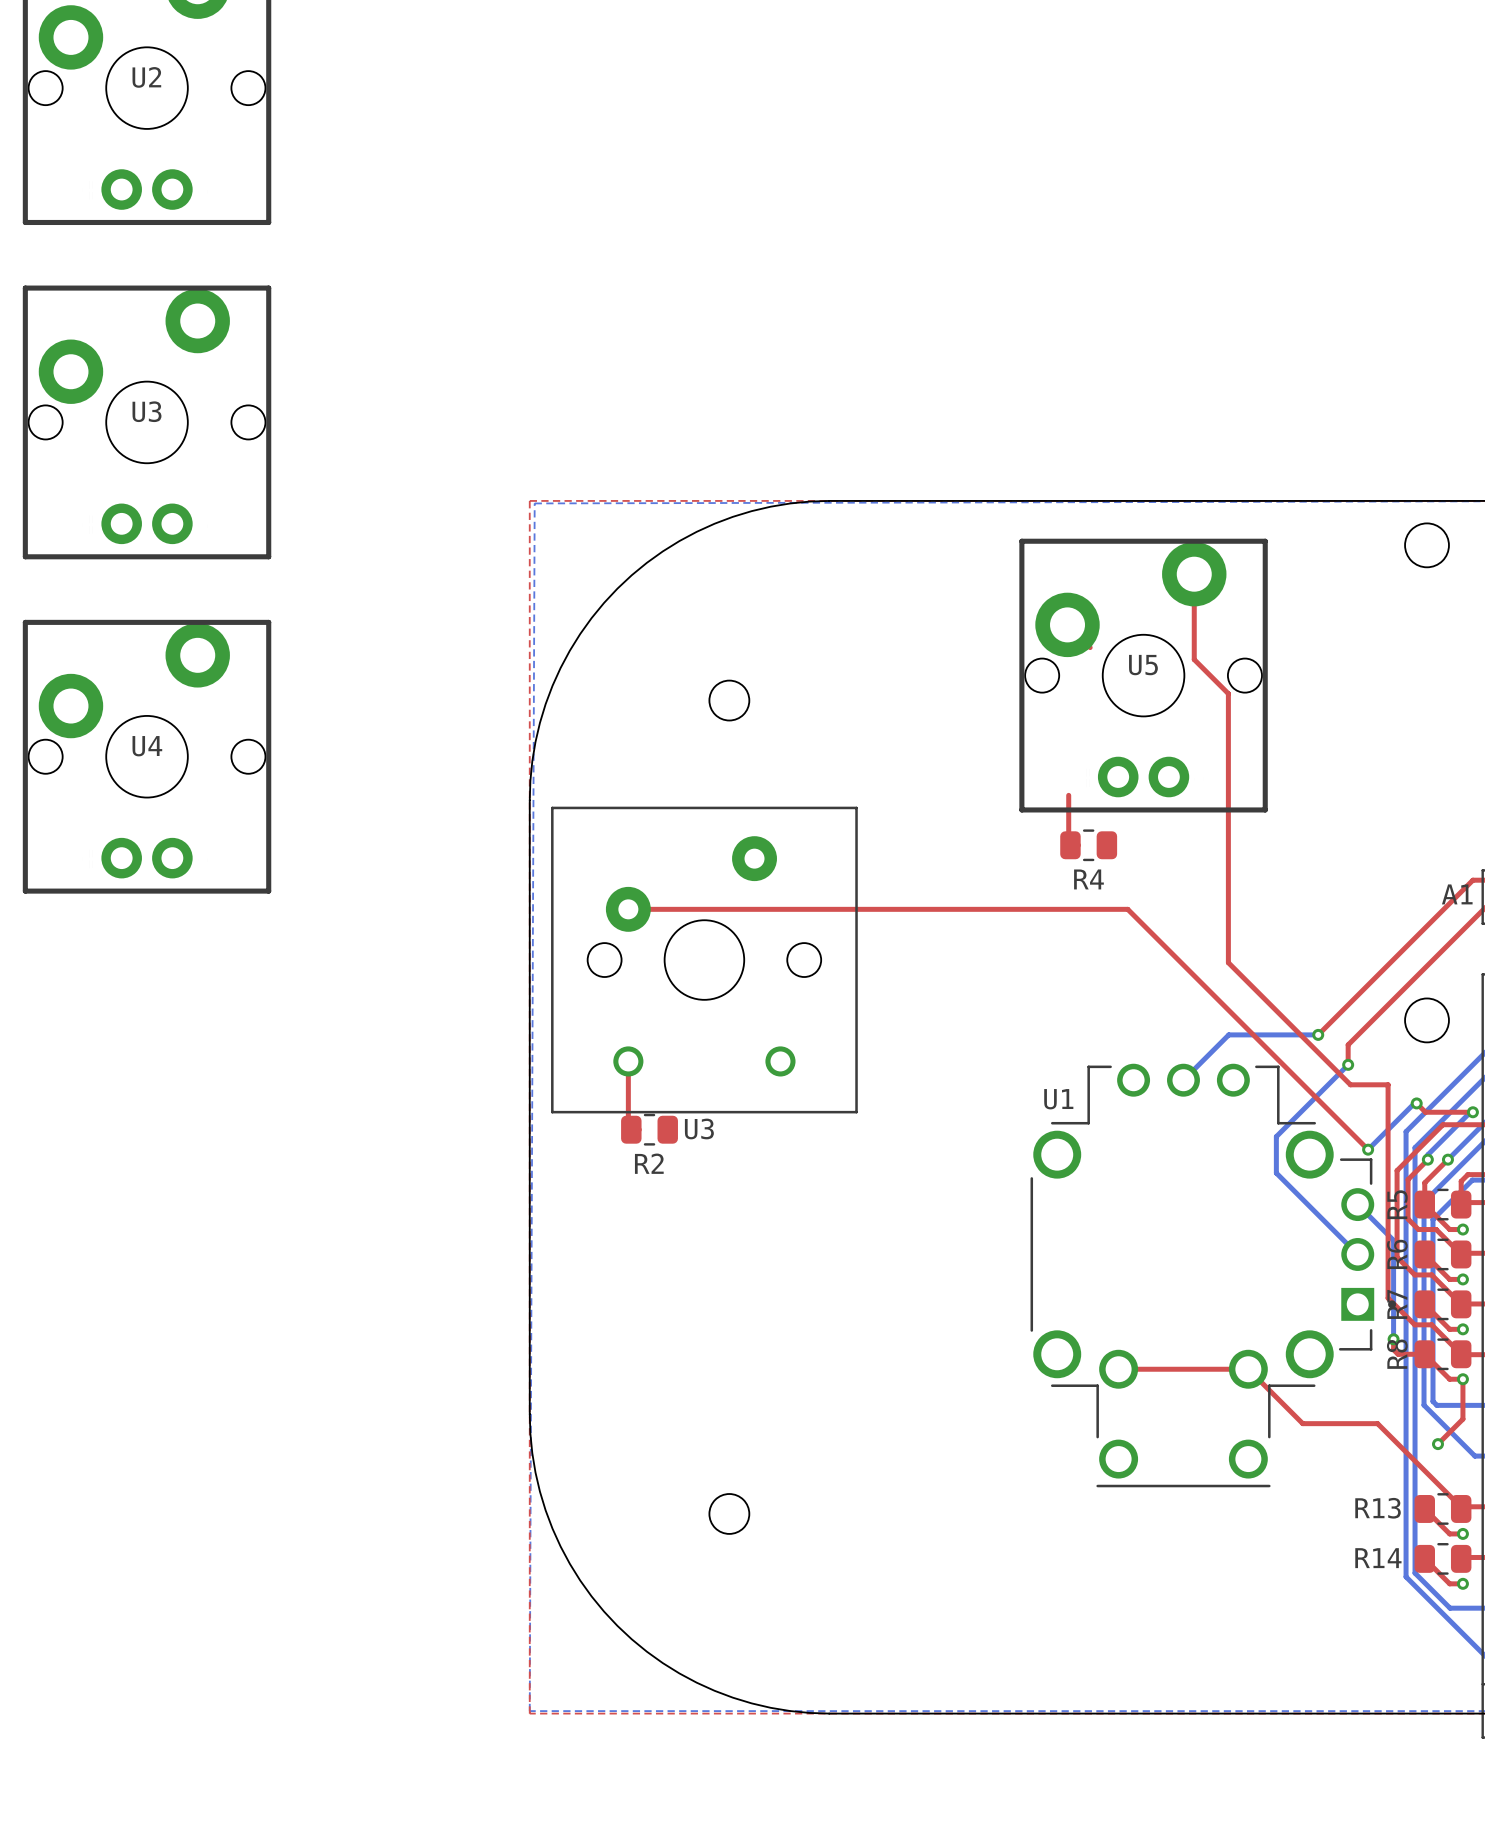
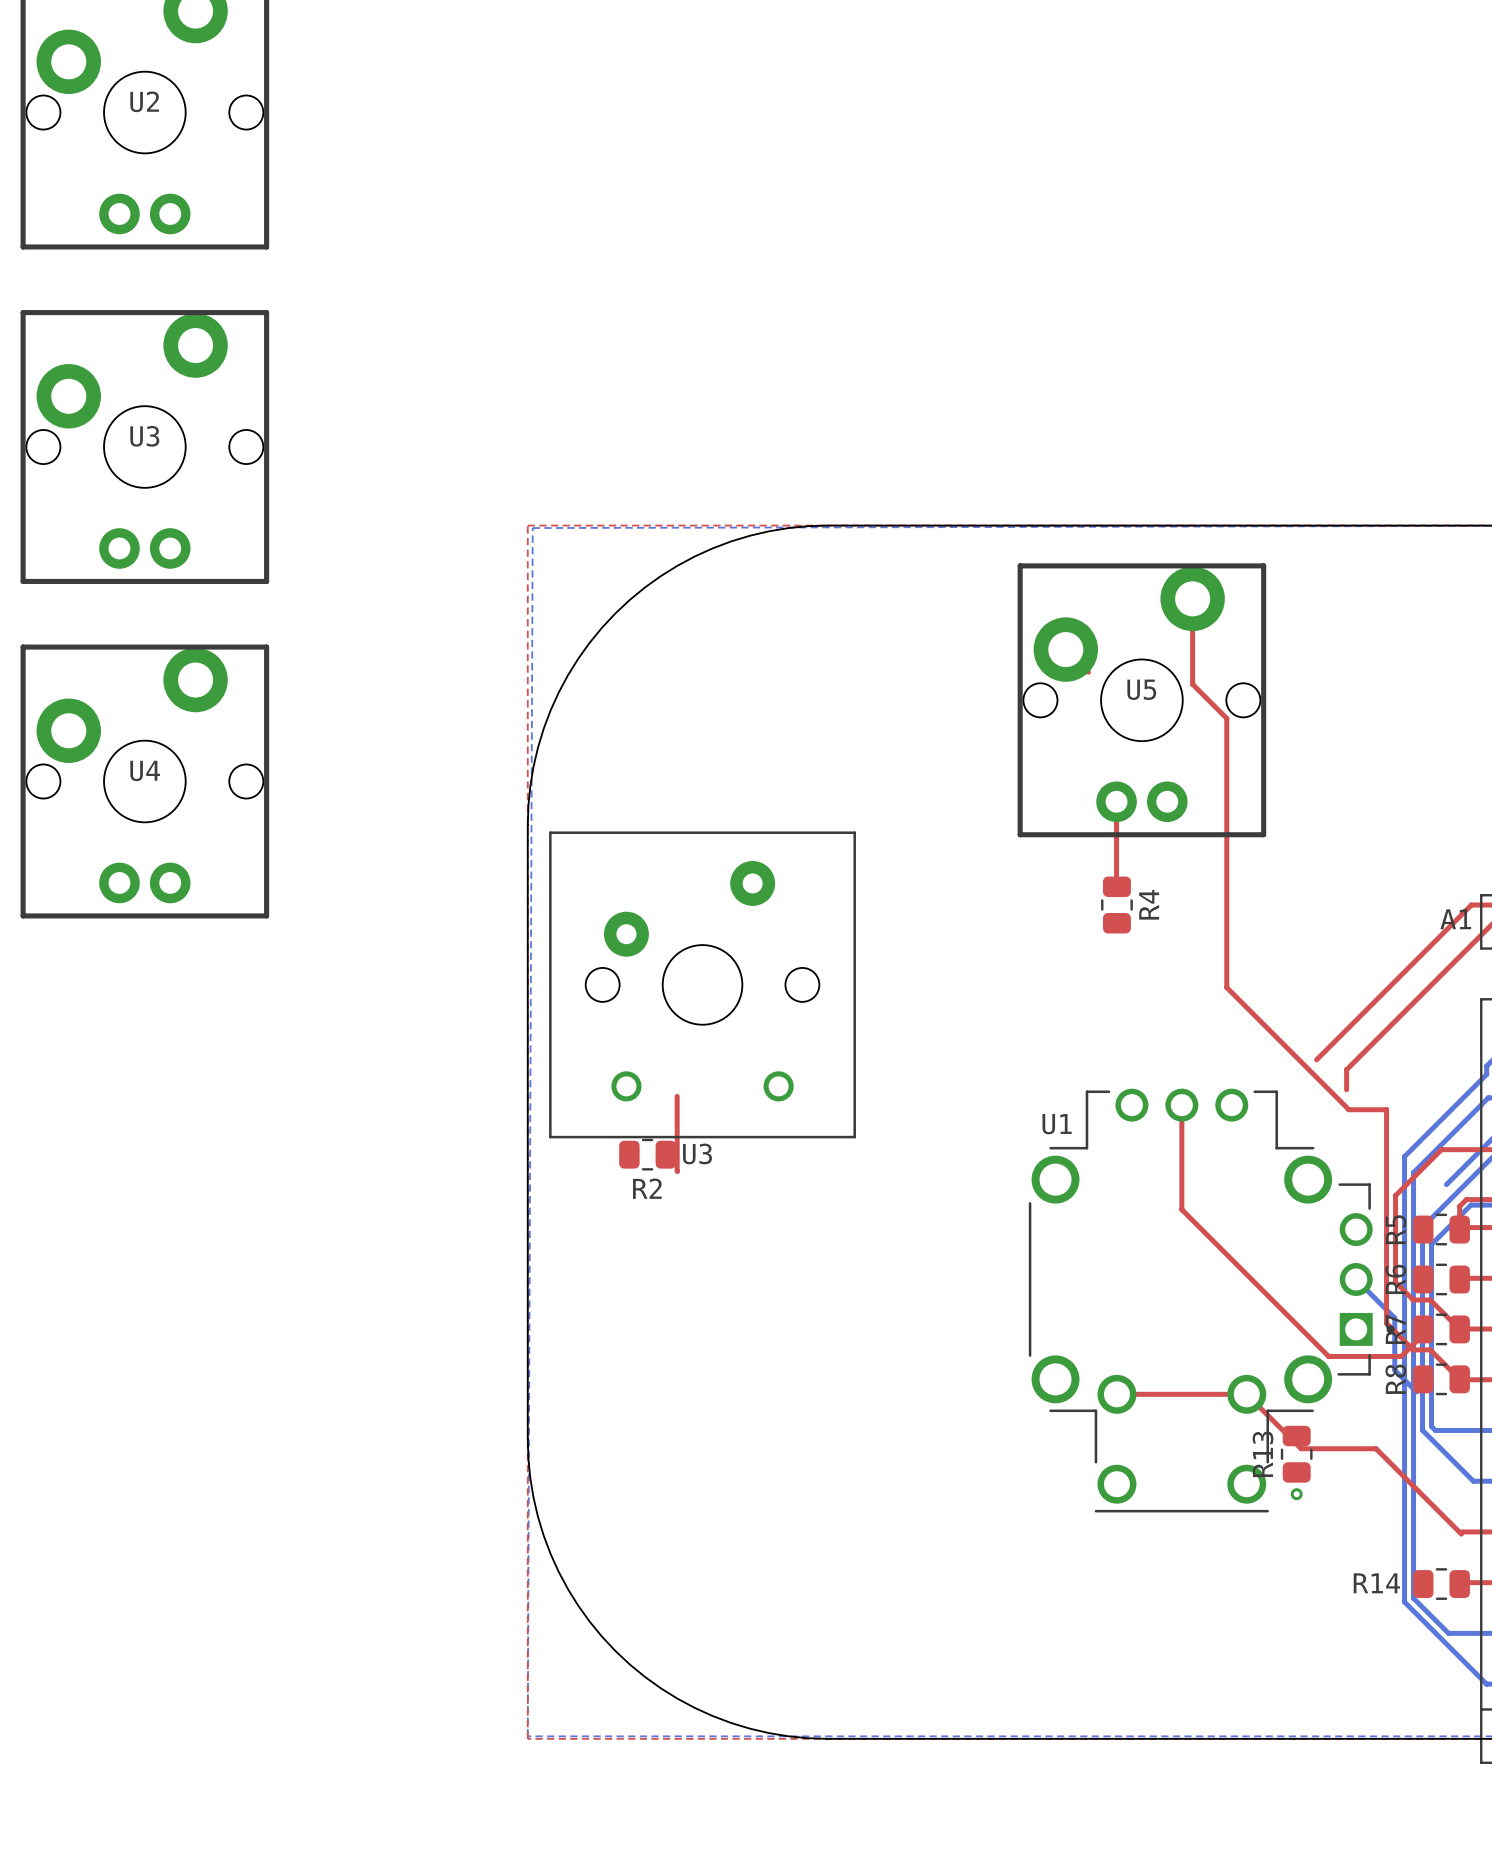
round board edge: [1404, 523, 1450, 568] -> none
round board edge: [709, 680, 750, 721] -> none
top track: none -> (1116, 811) (1116, 886)
top track: (1068, 795) (1068, 835) (1078, 845) -> none
R4 rotation: 0° (1088, 845) -> 90° clockwise (1116, 905)
R4 position: (1088, 845) -> (1116, 905)
R4 name position: R4 (1088, 879) -> R4 (1149, 904)
top track: (628, 909) (1127, 909) (1368, 1149) -> none
round board edge: [1404, 998, 1450, 1043] -> none
bottom track: (1318, 1034) (1228, 1034) (1183, 1080) -> none
via: (1318, 1034) -> none
top track: (628, 1061) (628, 1118) (639, 1129) -> none
bottom track: (1348, 1064) (1276, 1136) (1276, 1173) (1357, 1254) -> (1416, 1391) (1394, 1370) (1394, 1318) (1356, 1279)
via: (1348, 1064) -> none
top track: none -> (677, 1096) (677, 1171)
top track: none -> (1181, 1105) (1181, 1209) (1328, 1356) (1401, 1356) (1416, 1341)
top track: (1416, 1103) (1425, 1112) (1472, 1112) -> none
bottom track: (1416, 1103) (1414, 1103) (1368, 1149) -> none
via: (1416, 1103) -> none
bottom track: (1472, 1112) (1470, 1112) (1427, 1154) (1427, 1159) -> none
via: (1472, 1112) -> none
via: (1368, 1149) -> none
top track: (1427, 1159) (1408, 1179) (1408, 1219) (1418, 1229) (1436, 1229) (1461, 1254) -> none
via: (1427, 1159) -> none
top track: (1447, 1159) (1424, 1182) (1424, 1204) (1449, 1229) (1462, 1229) -> none
via: (1447, 1159) -> none
bottom track: (1357, 1204) (1393, 1240) (1393, 1339) -> none
via: (1462, 1229) -> none
top track: (1424, 1254) (1449, 1279) (1462, 1279) -> none
via: (1462, 1279) -> none
top track: (1424, 1304) (1449, 1329) (1462, 1329) -> none
via: (1462, 1329) -> none
top track: (1393, 1339) (1393, 1349) (1398, 1354) (1424, 1354) (1449, 1379) (1462, 1379) (1462, 1419) (1437, 1444) -> none
via: (1393, 1339) -> none
via: (1462, 1379) -> none
via: (1437, 1444) -> none
via: none -> (1296, 1494)
round board edge: [709, 1493, 750, 1535] -> none
top track: (1424, 1508) (1449, 1533) (1462, 1533) -> none
R13 rotation: 0° (1442, 1508) -> 90° clockwise (1296, 1454)
R13 position: (1442, 1508) -> (1296, 1454)
via: (1462, 1533) -> none
top track: (1424, 1558) (1449, 1583) (1462, 1583) -> none
via: (1462, 1583) -> none

